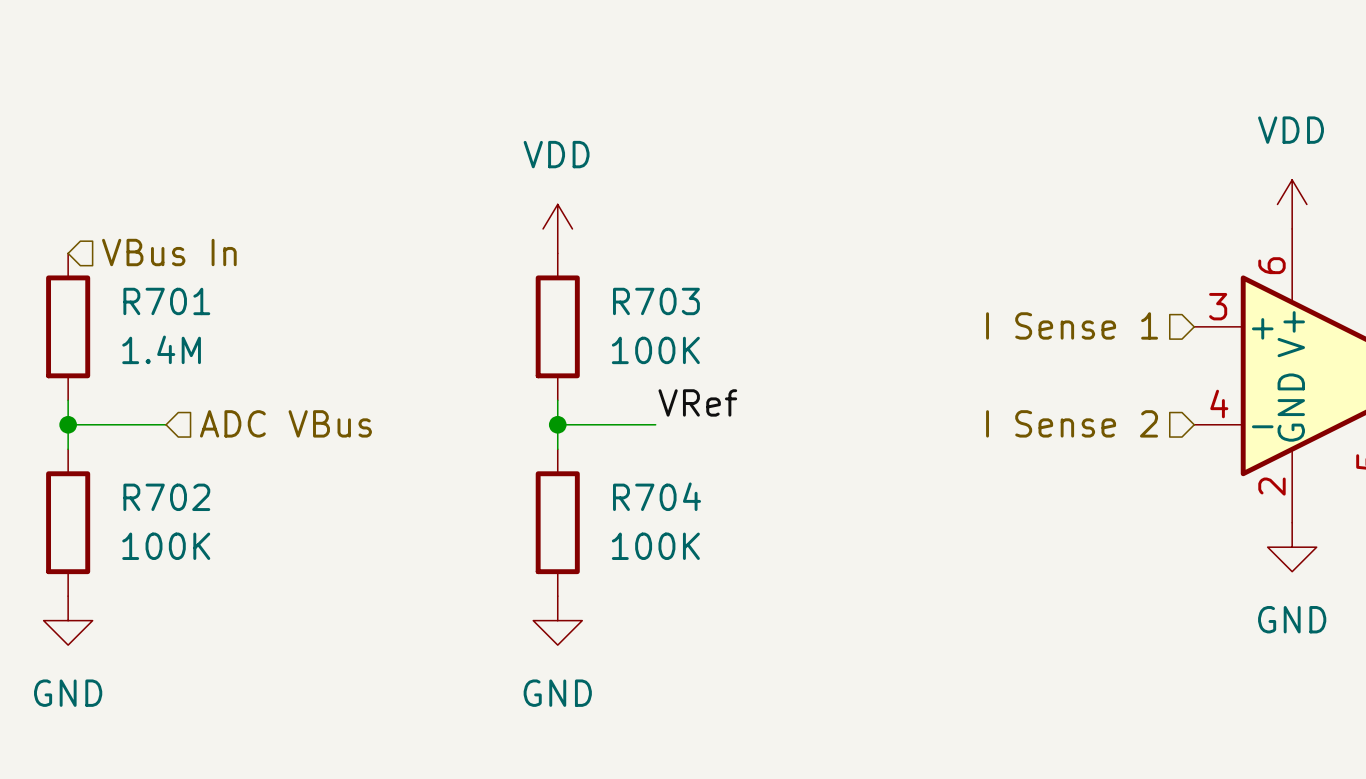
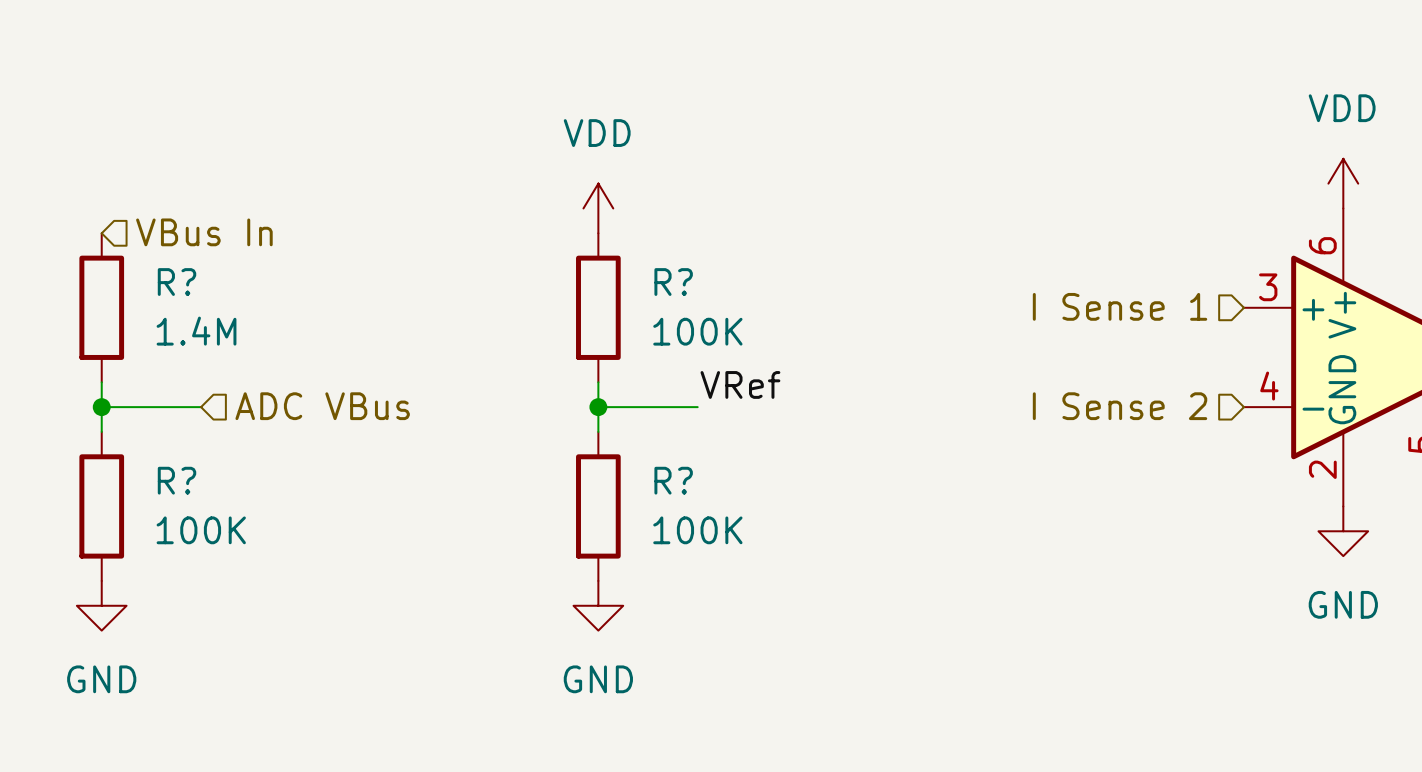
R701 name: R701 (166, 301) -> R? (177, 282)
R703 name: R703 (656, 301) -> R? (673, 282)
R704 name: R704 (657, 496) -> R? (673, 480)
R702 name: R702 (166, 497) -> R? (177, 480)

